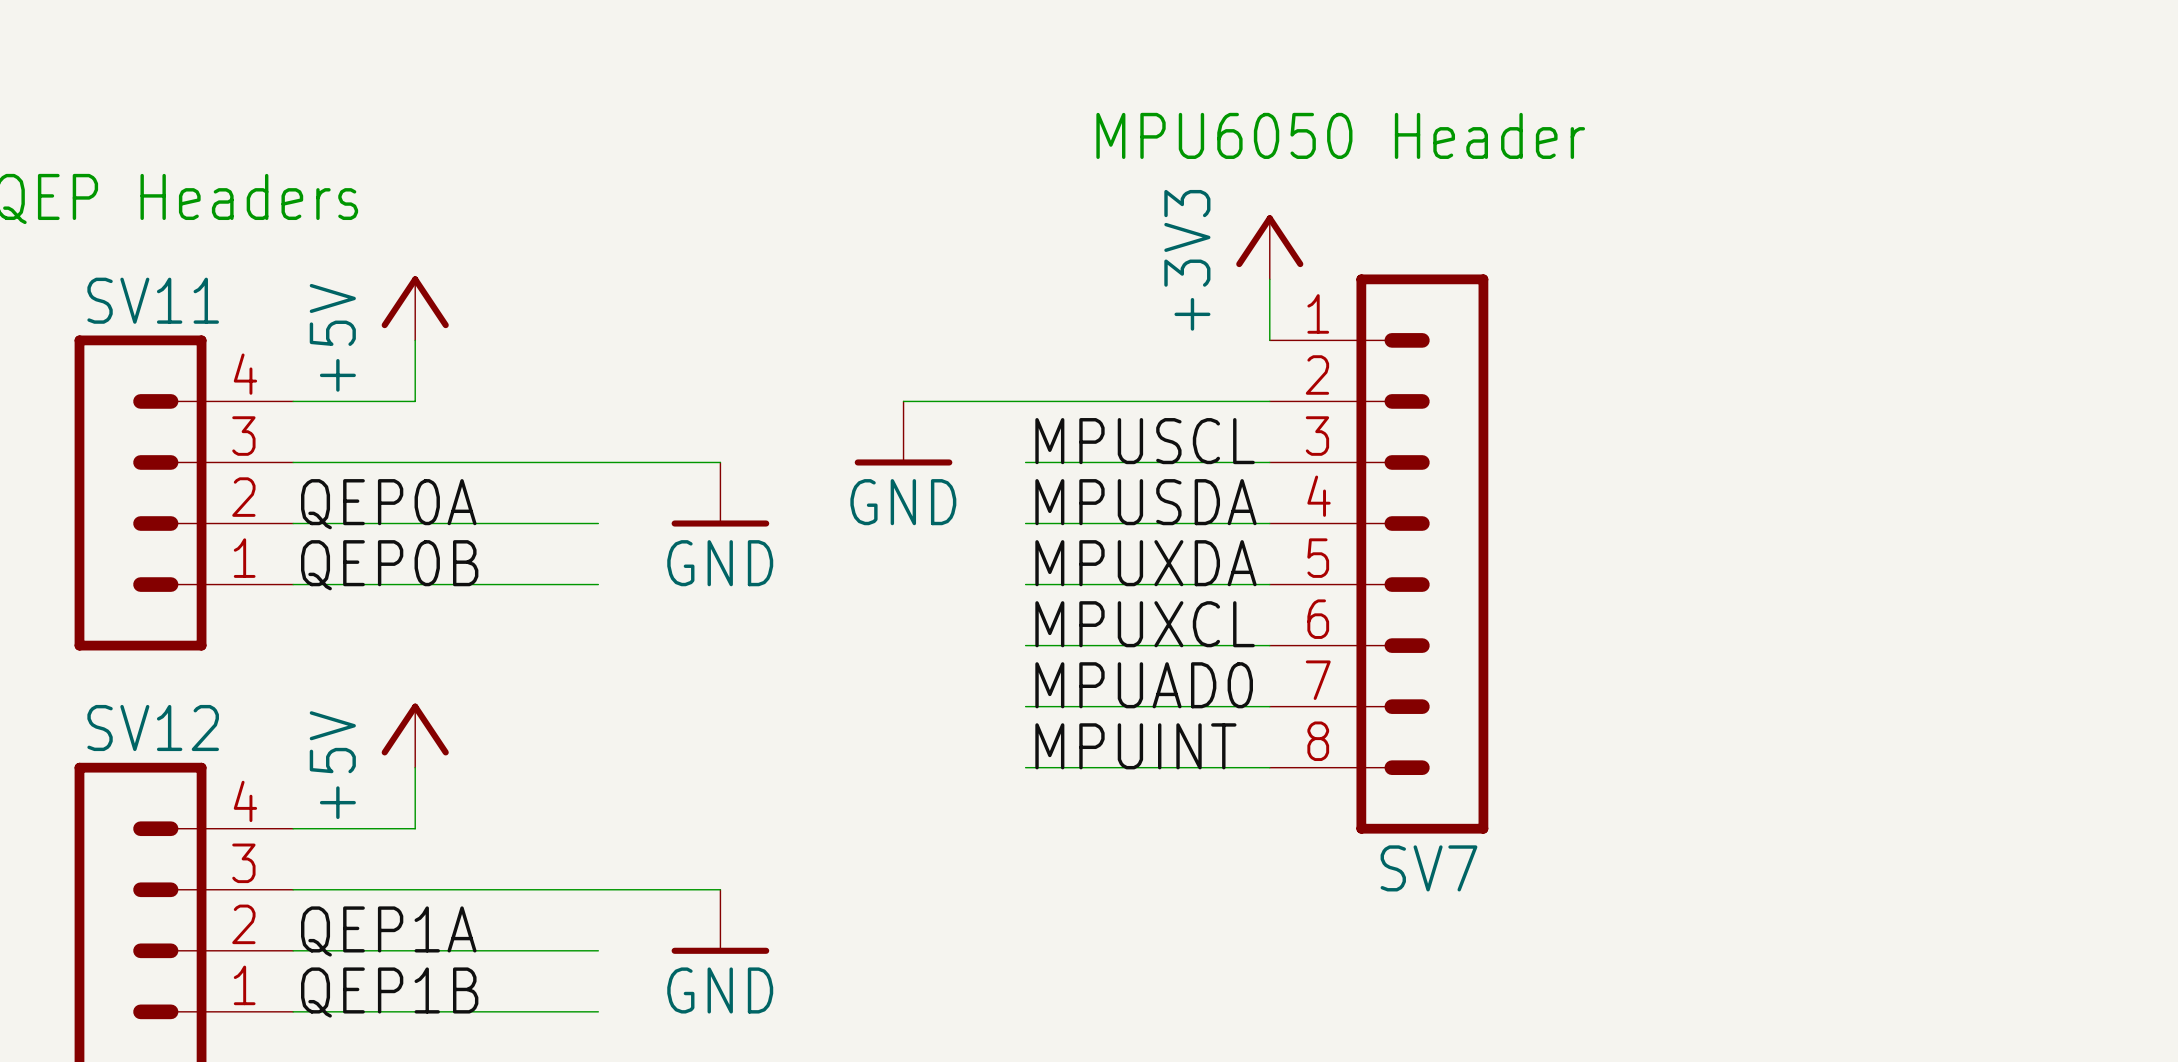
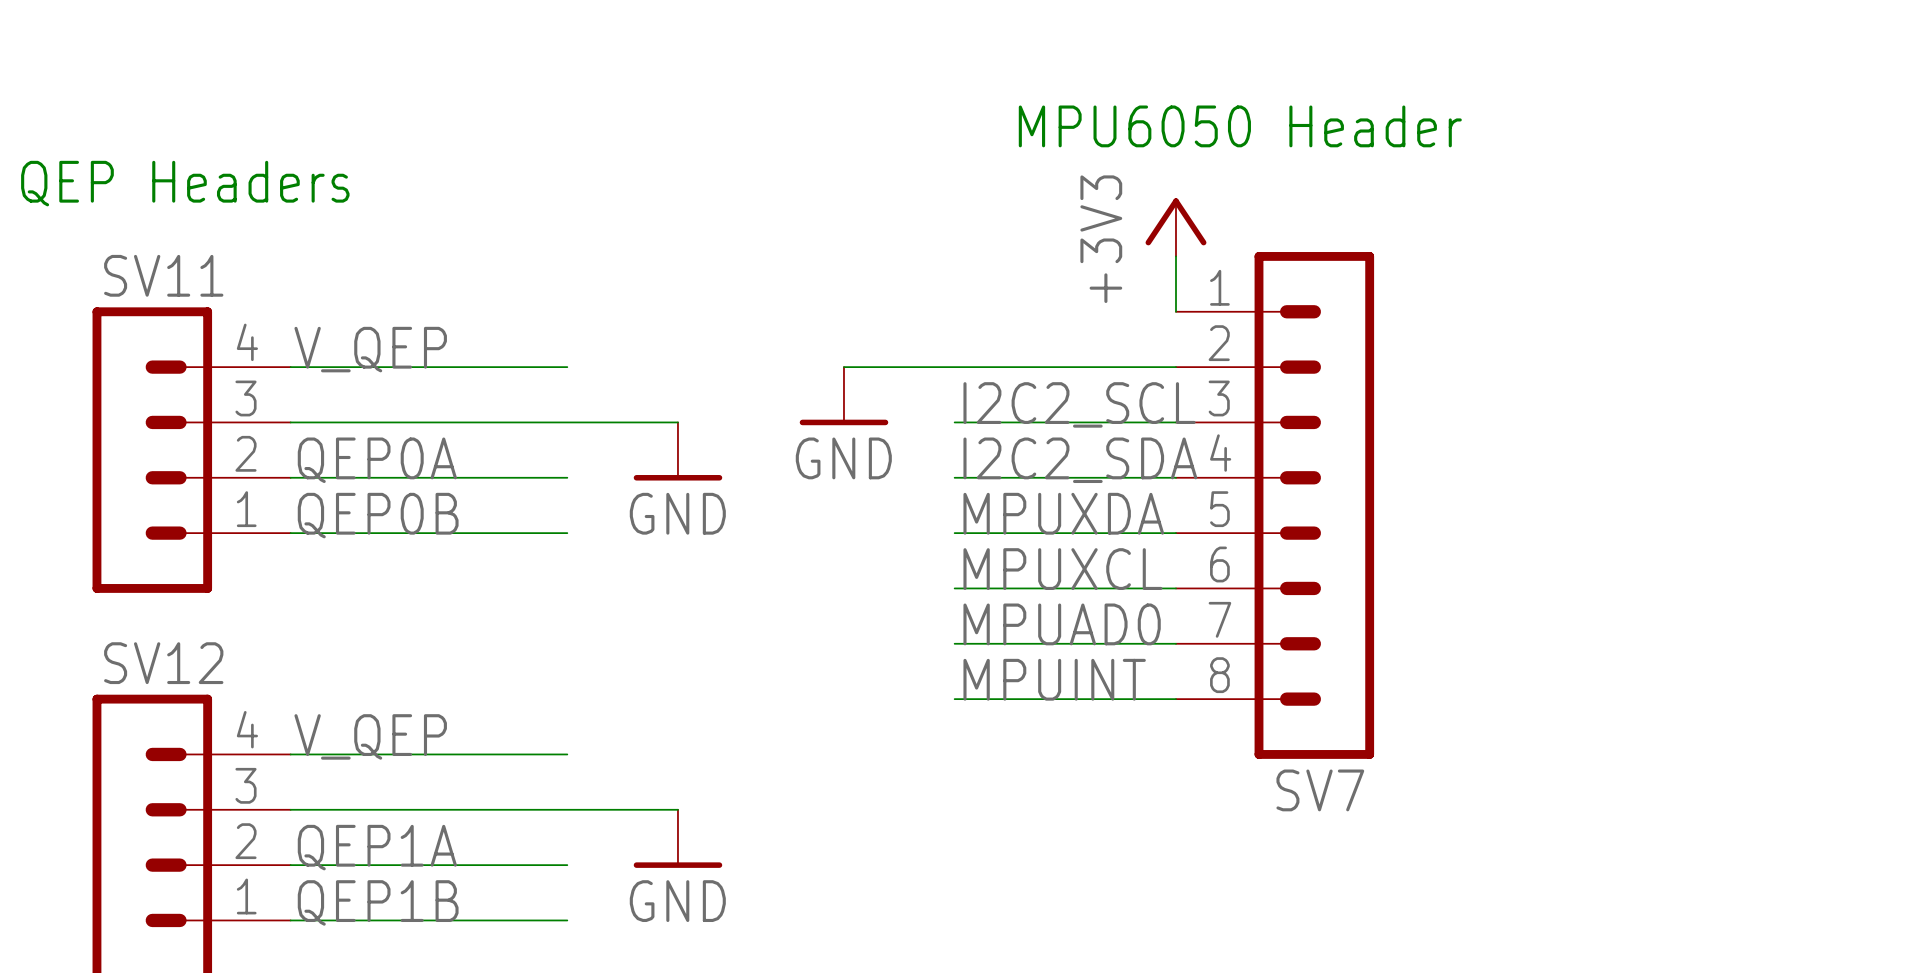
power symbol: +5V (415, 308) -> none
wire: (415, 340) (415, 401) -> (567, 367) (401, 367)
label: none -> V_QEP (370, 349)
label: MPUSCL (1145, 441) -> I2C2_SCL (1079, 404)
label: MPUSDA (1145, 502) -> I2C2_SDA (1080, 460)
power symbol: +5V (415, 735) -> none
wire: (415, 767) (415, 828) -> (567, 754) (401, 754)
label: none -> V_QEP (370, 736)

